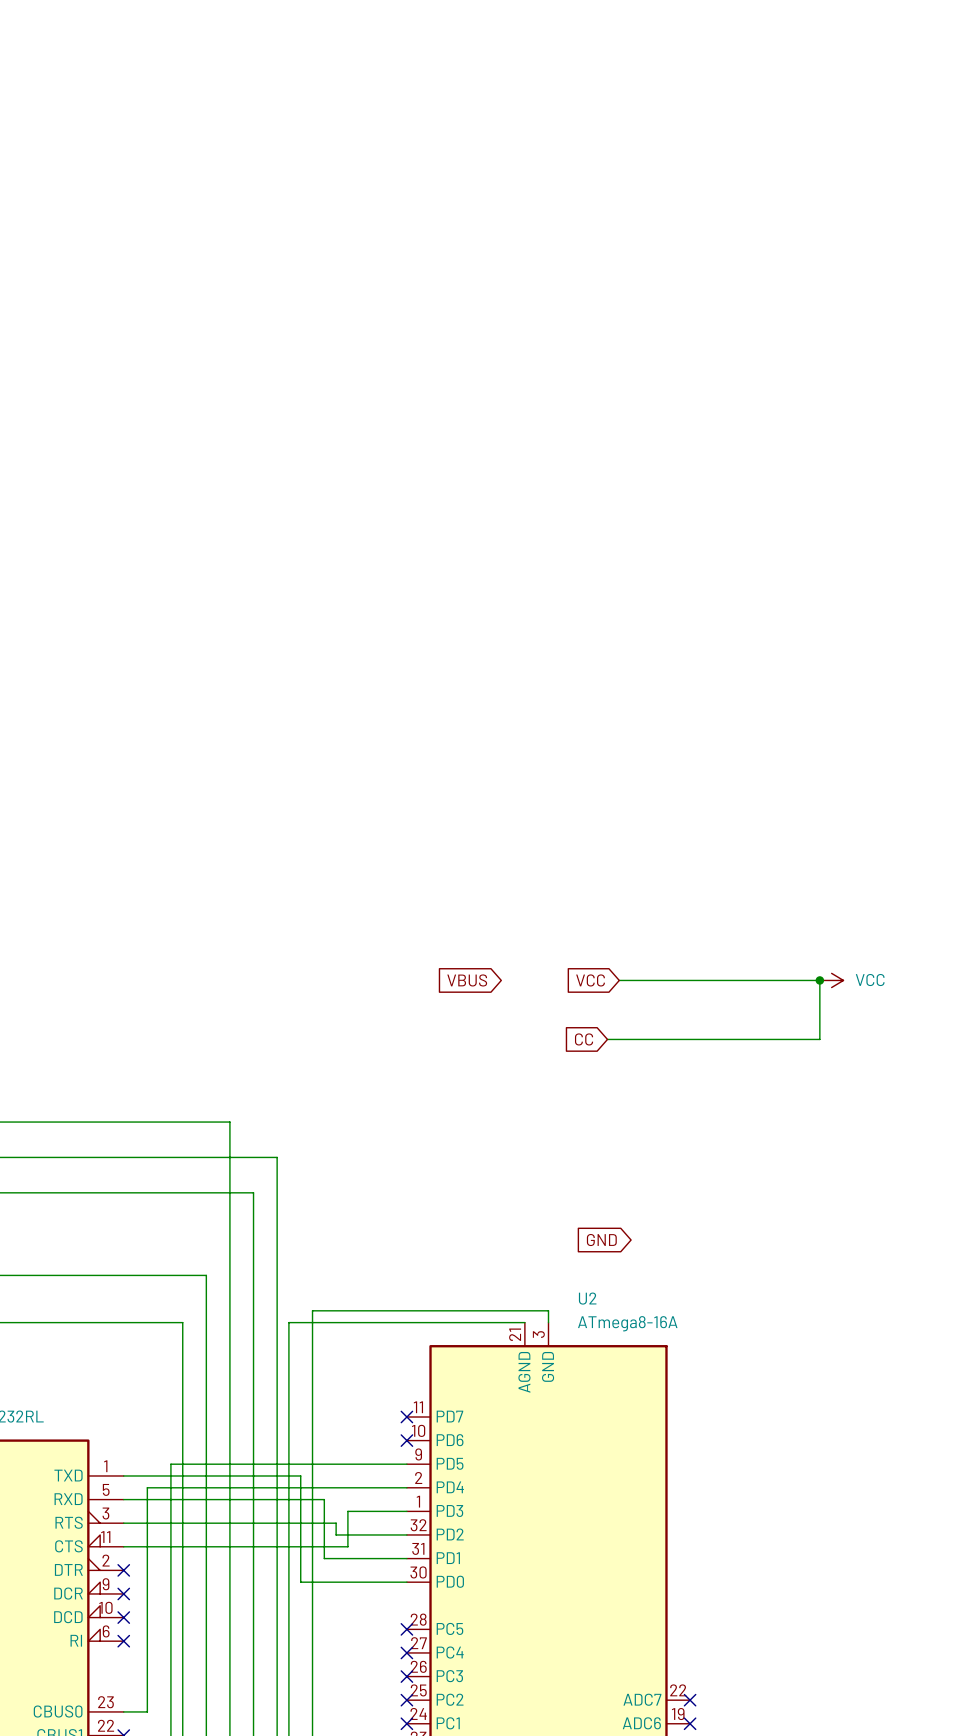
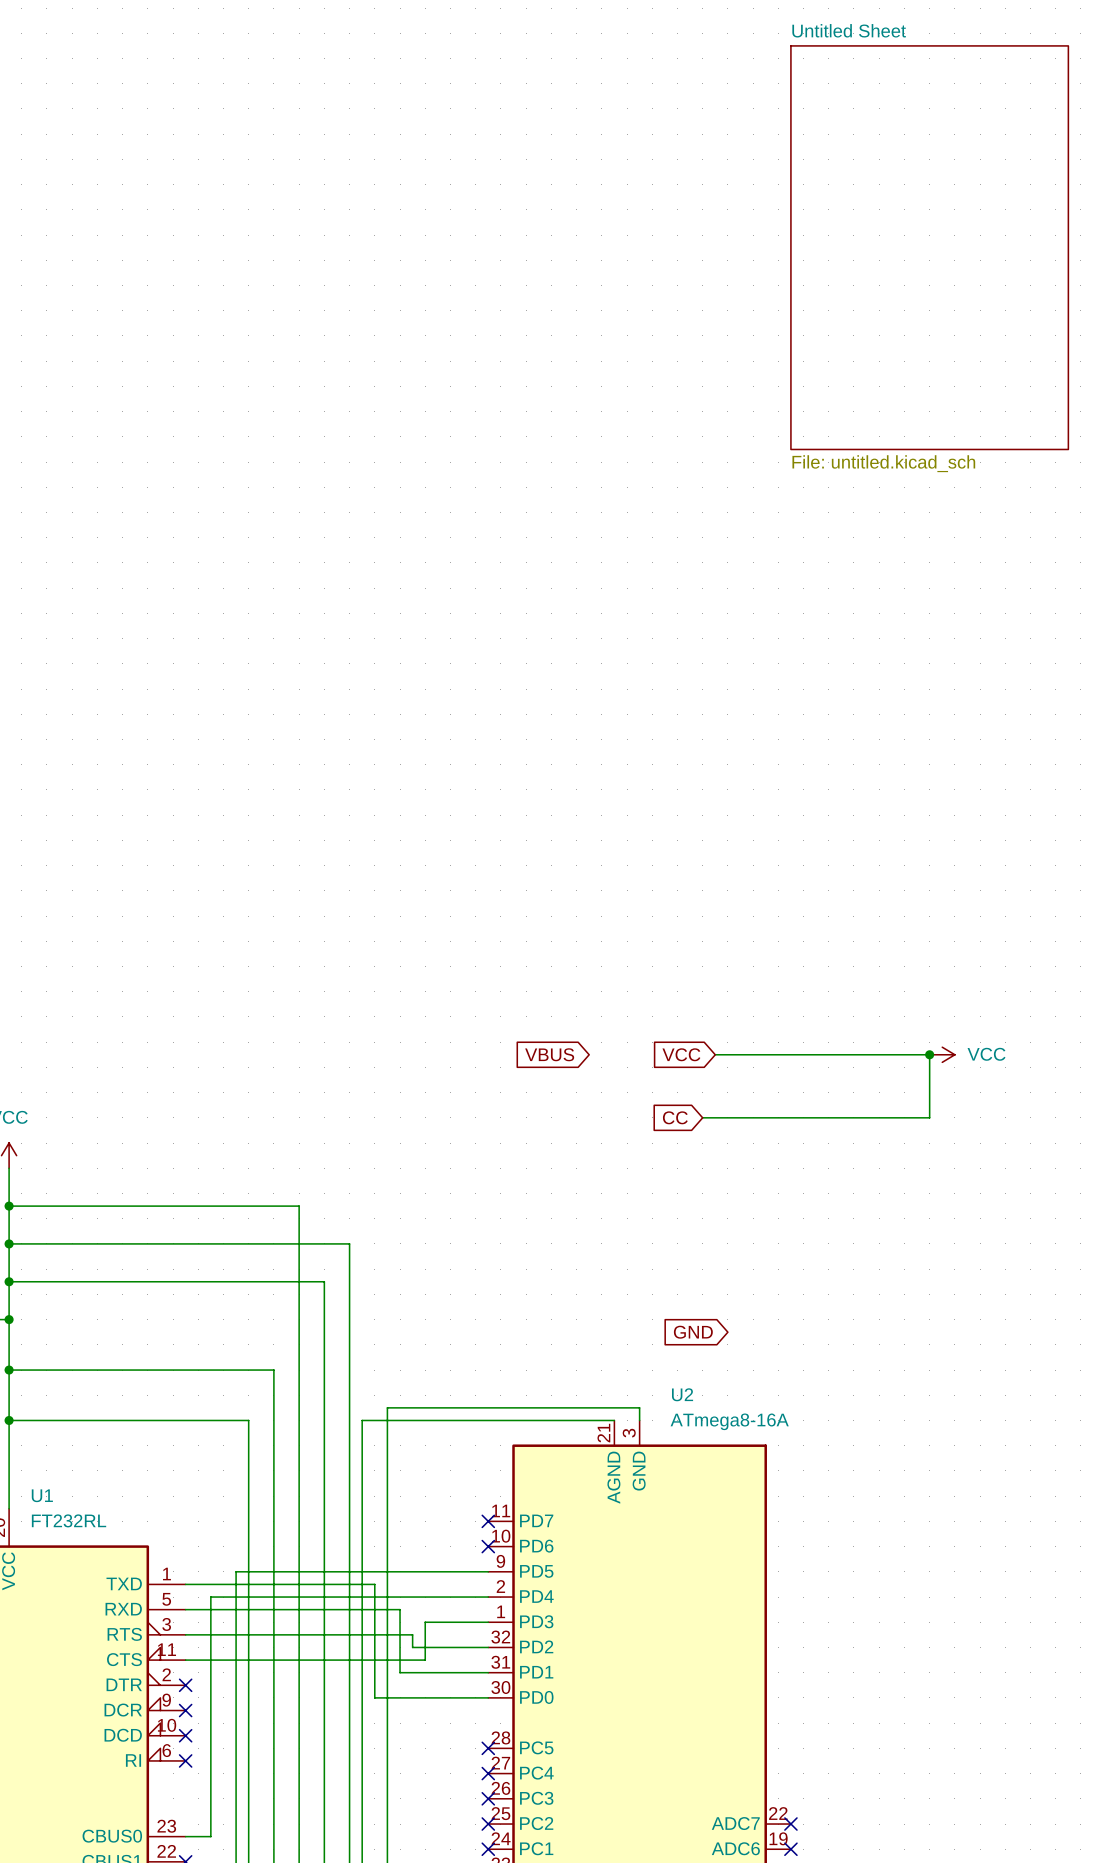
sheet Untitled Sheet: none -> File: untitled.kicad_sch (929, 247)

